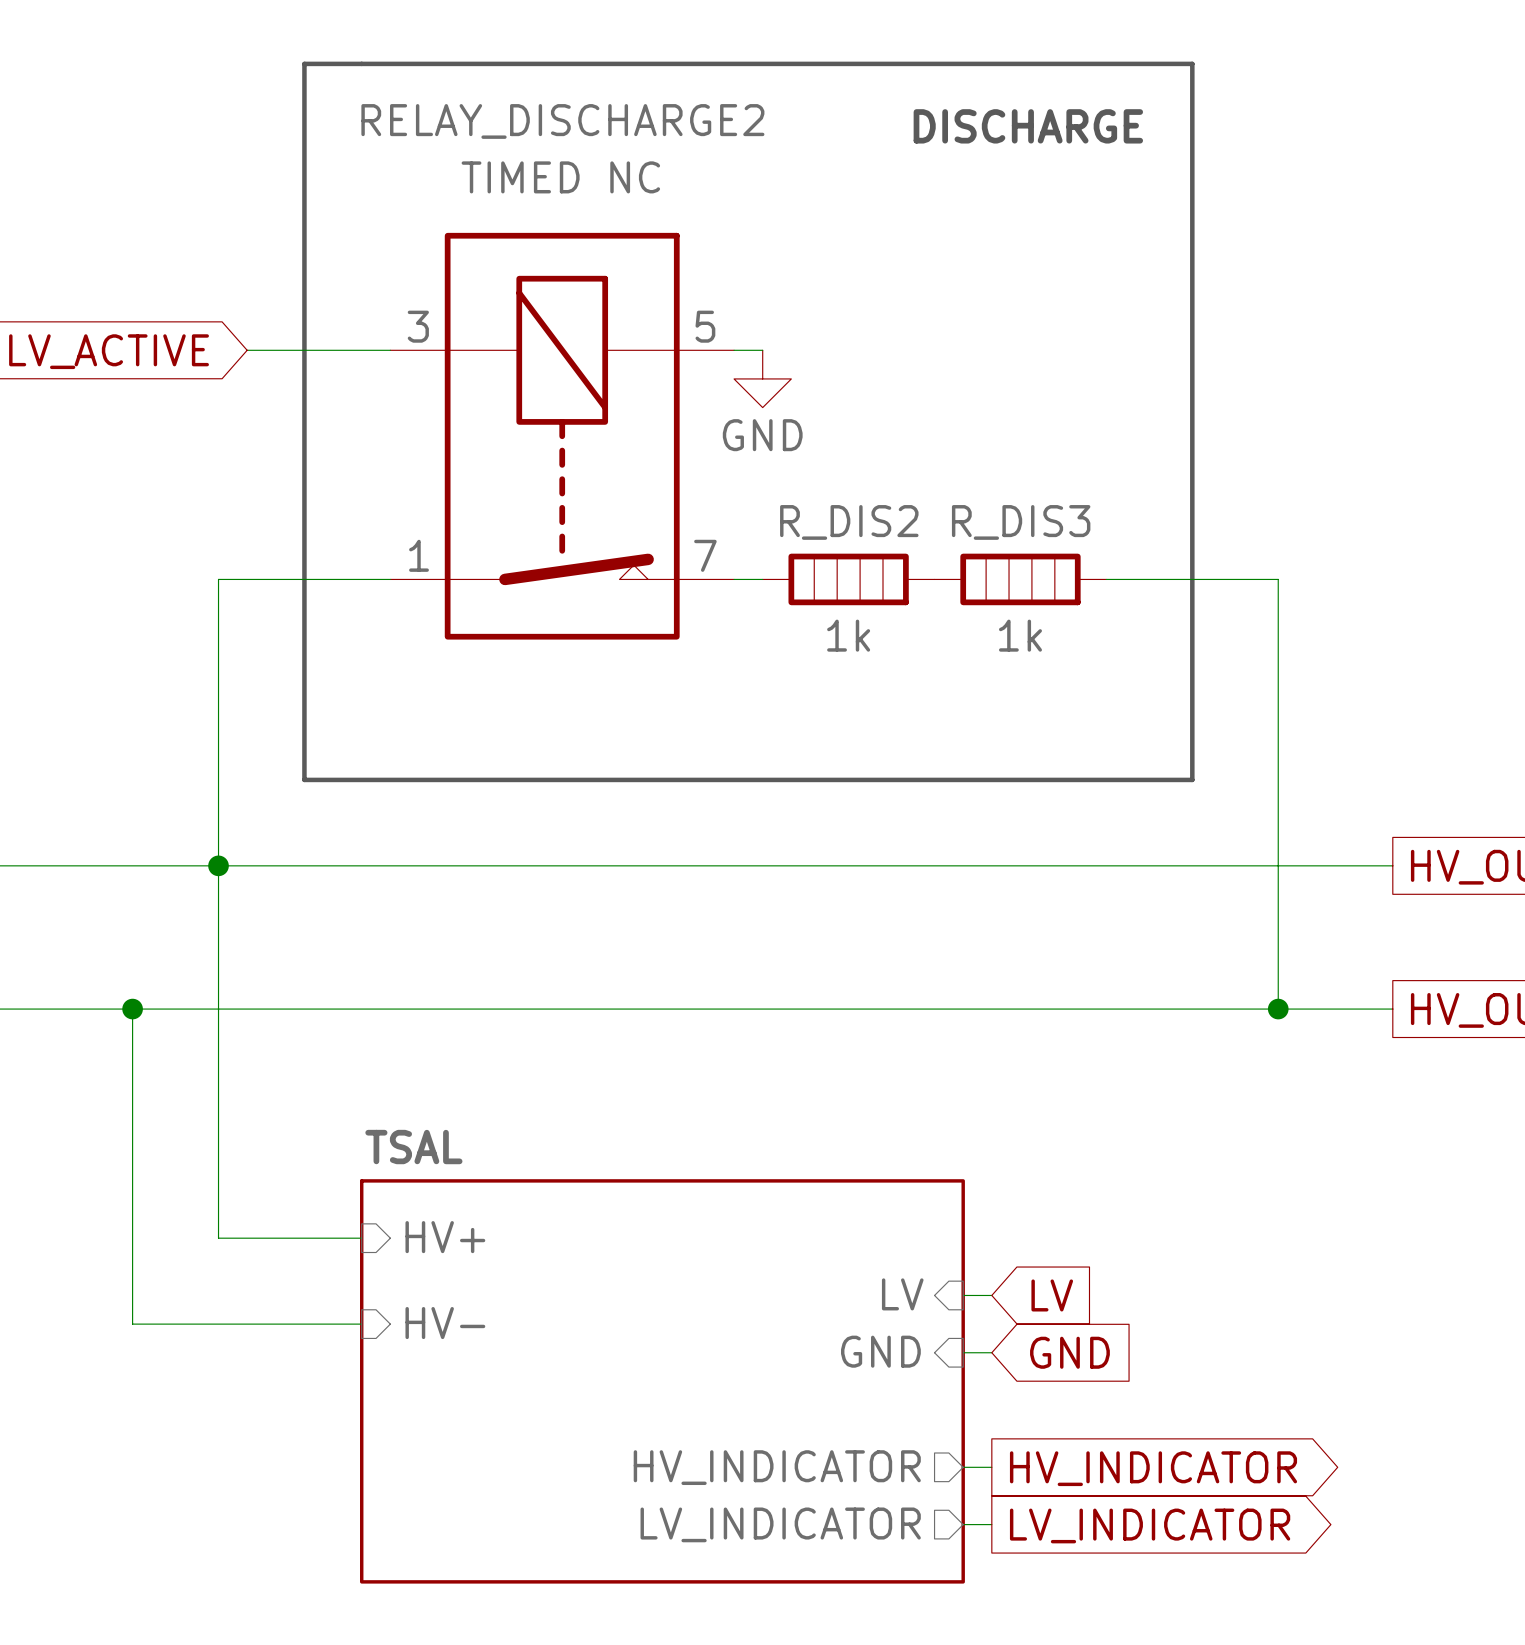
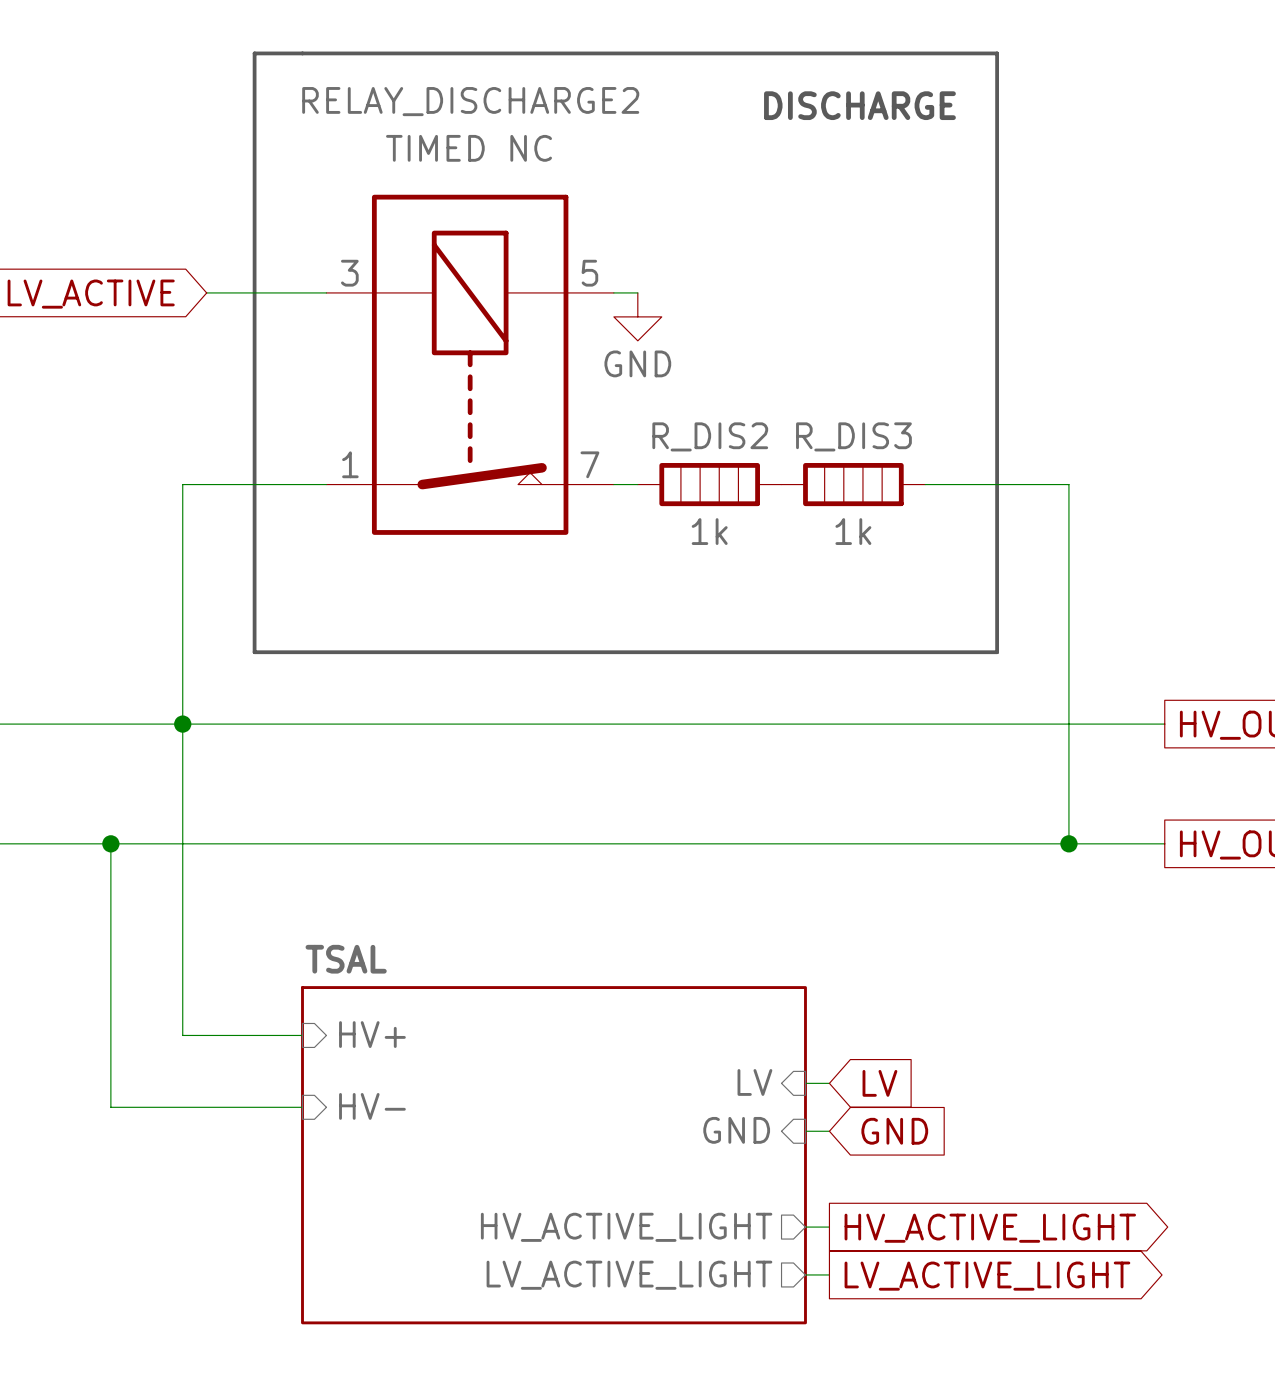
sheet pin: HV_INDICATOR (777, 1467) -> HV_ACTIVE_LIGHT (626, 1227)
global label: HV_INDICATOR (1153, 1468) -> HV_ACTIVE_LIGHT (990, 1228)
sheet pin: LV_INDICATOR (780, 1524) -> LV_ACTIVE_LIGHT (629, 1275)
global label: LV_INDICATOR (1150, 1525) -> LV_ACTIVE_LIGHT (987, 1276)

